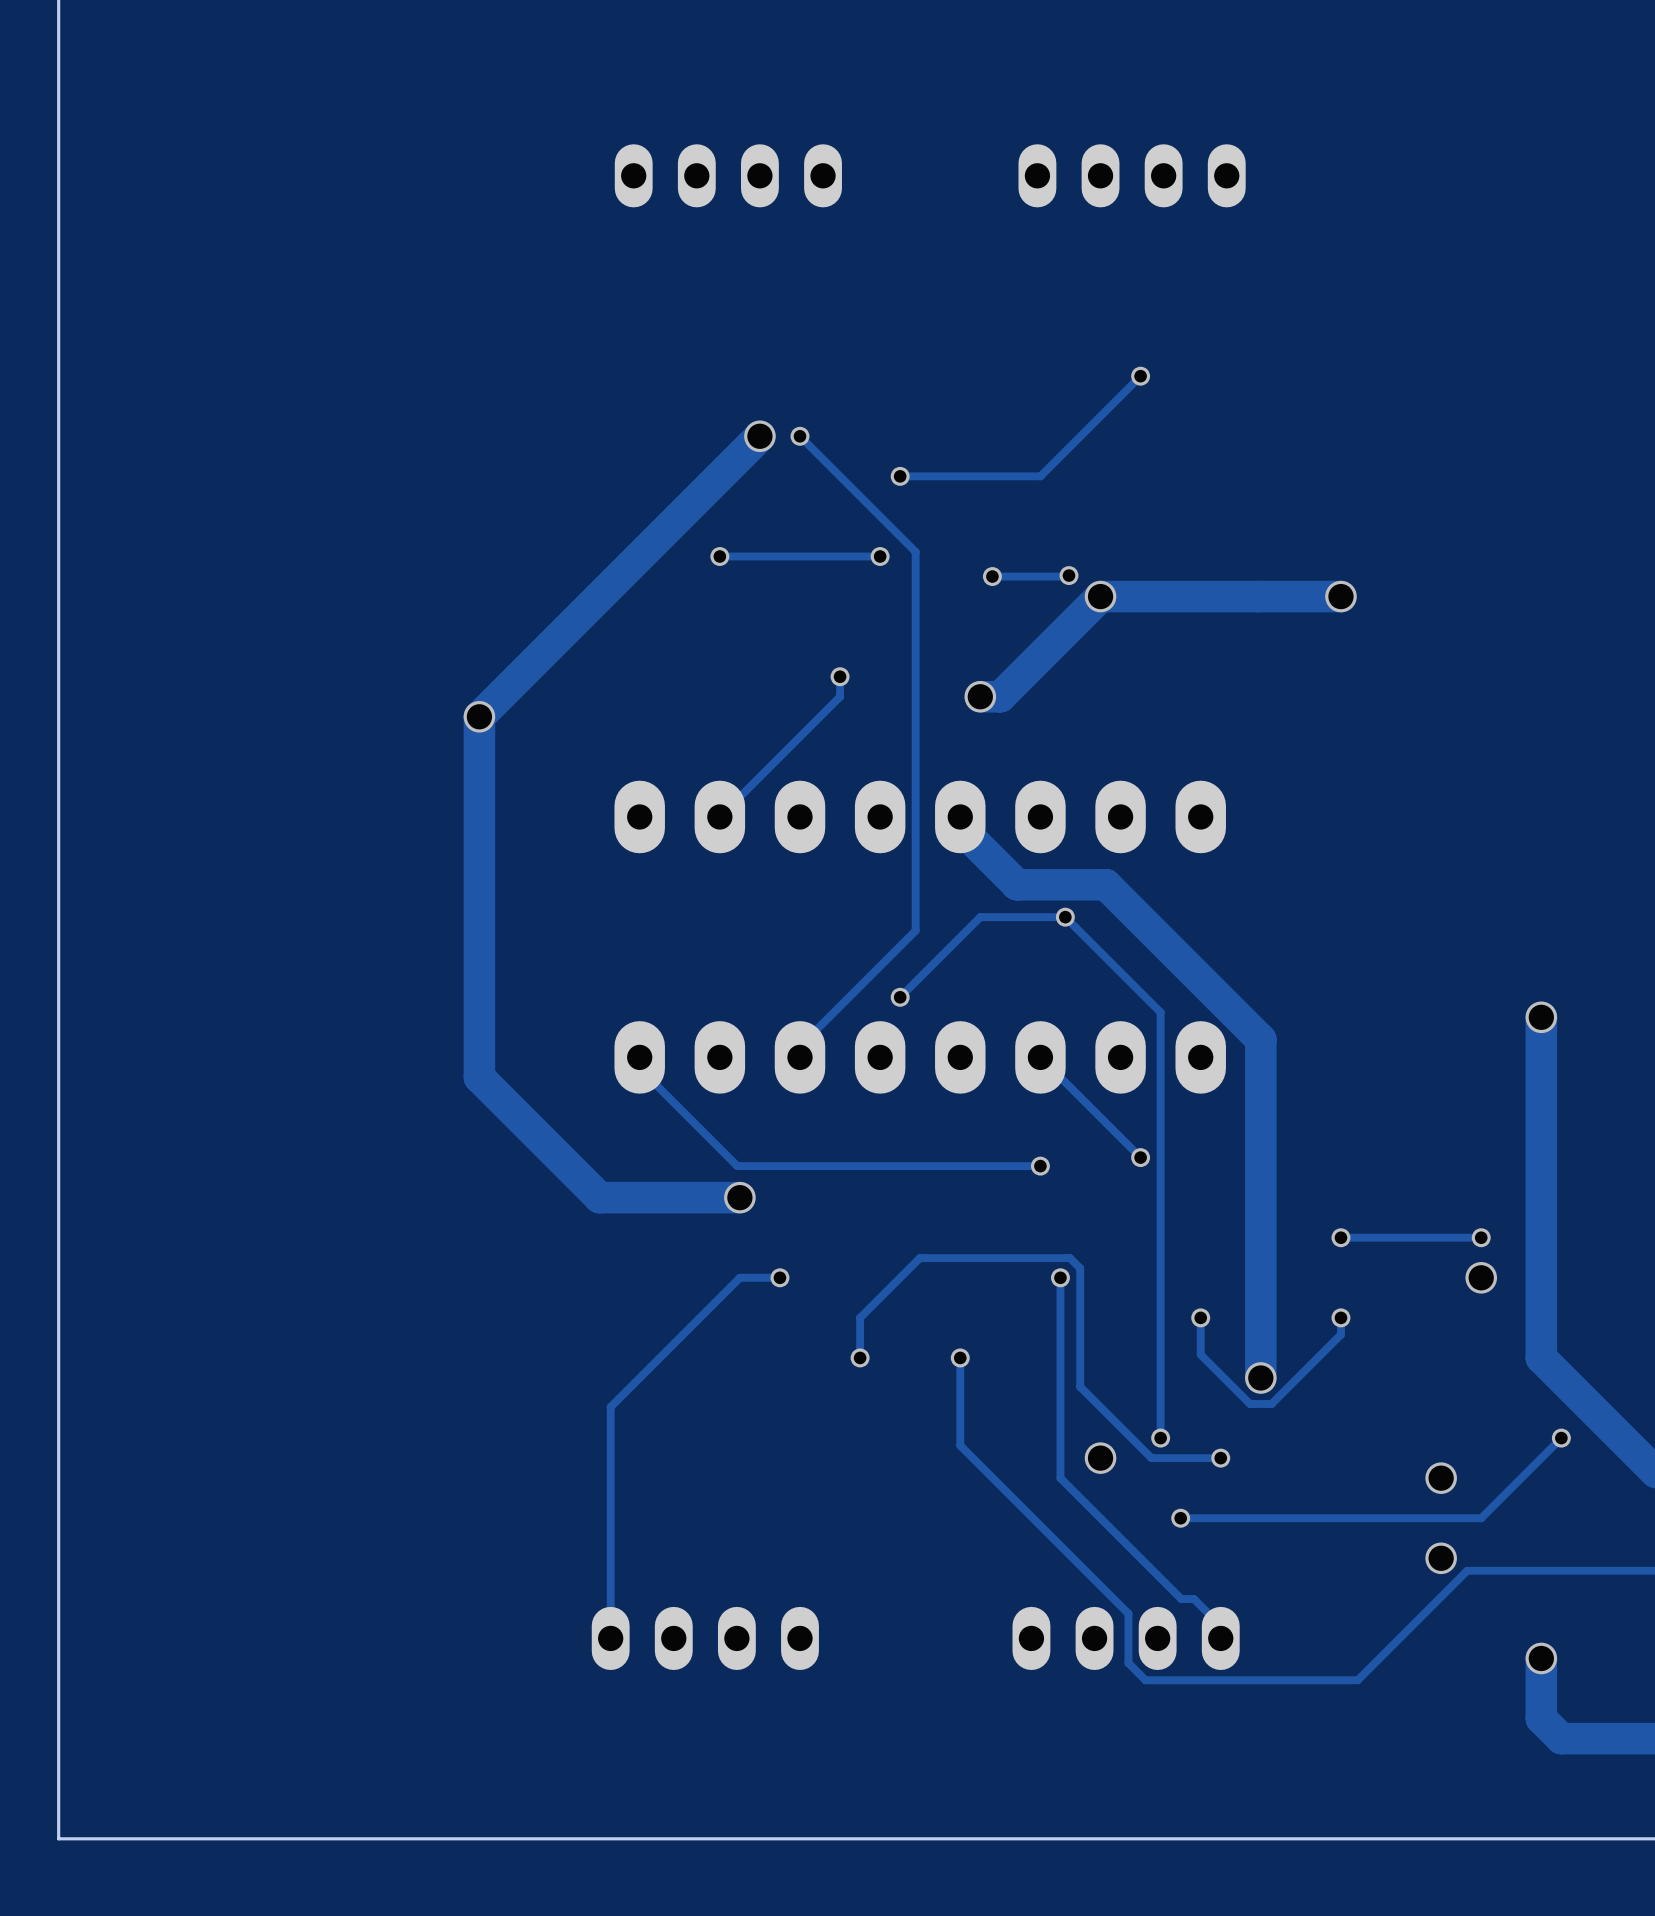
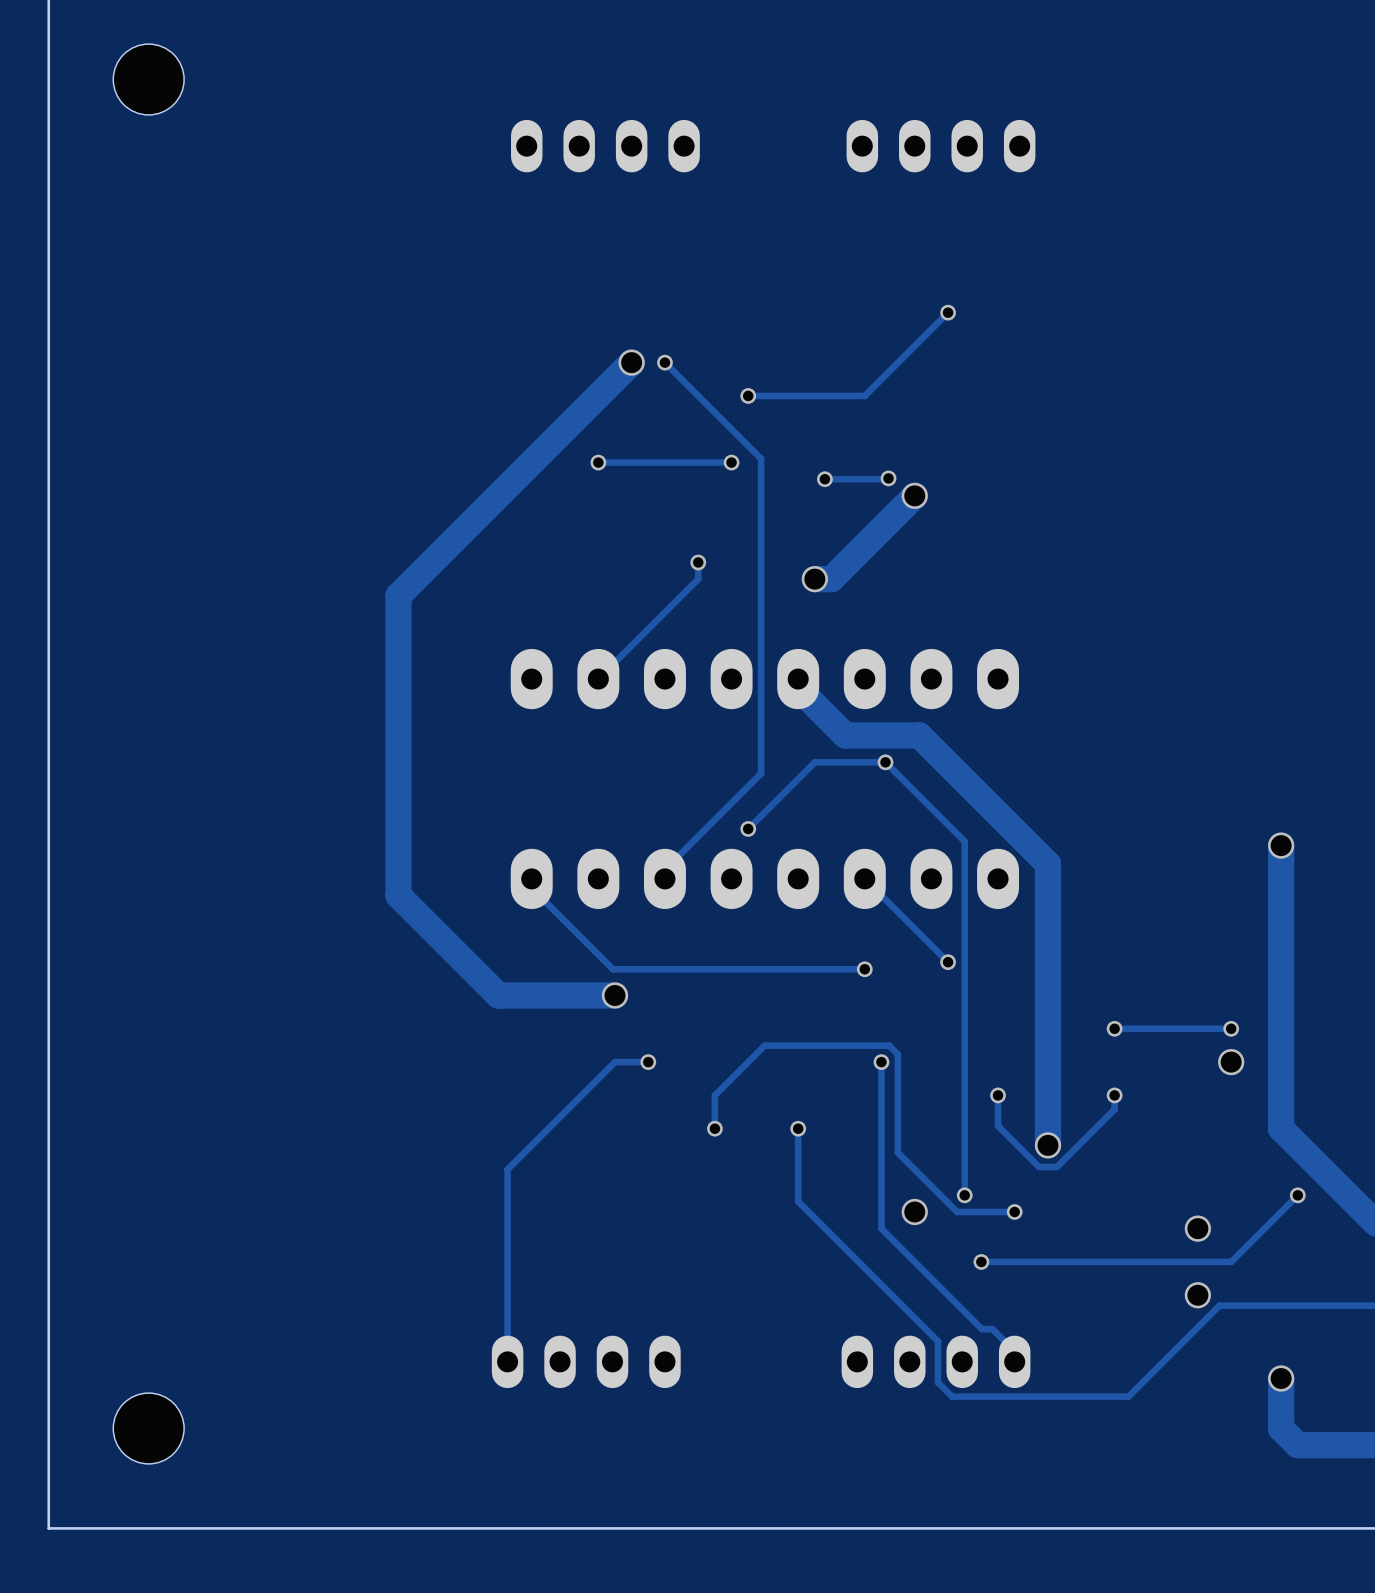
part: none -> (148, 79)
track: (1340, 596) (1100, 596) -> none
via: (1340, 596) -> none
via: (479, 716) -> none
part: none -> (148, 1428)

